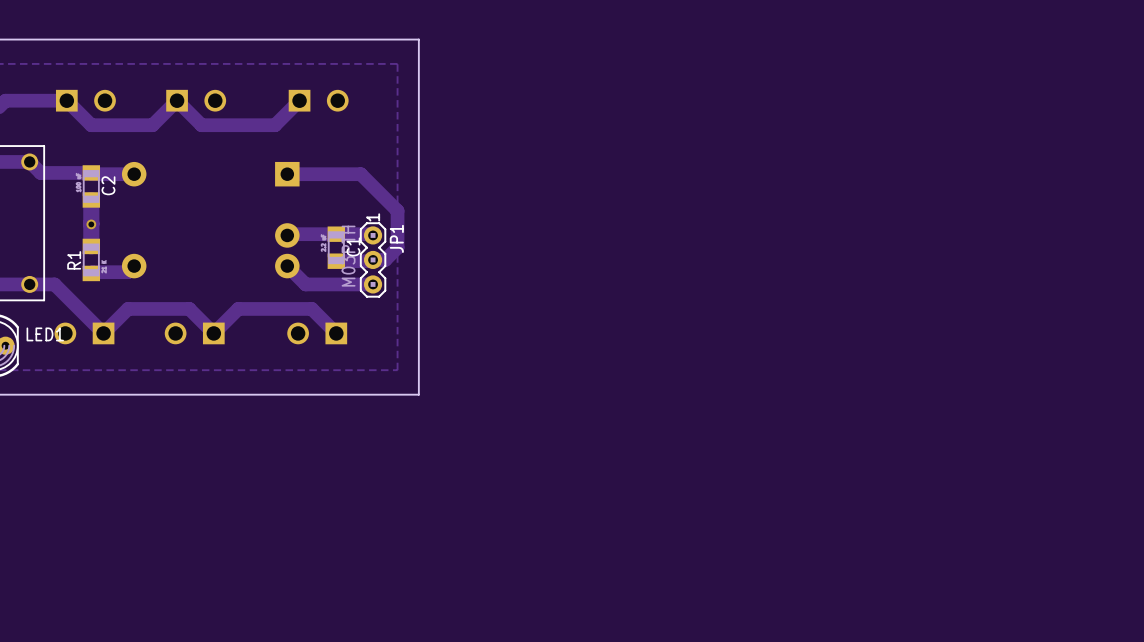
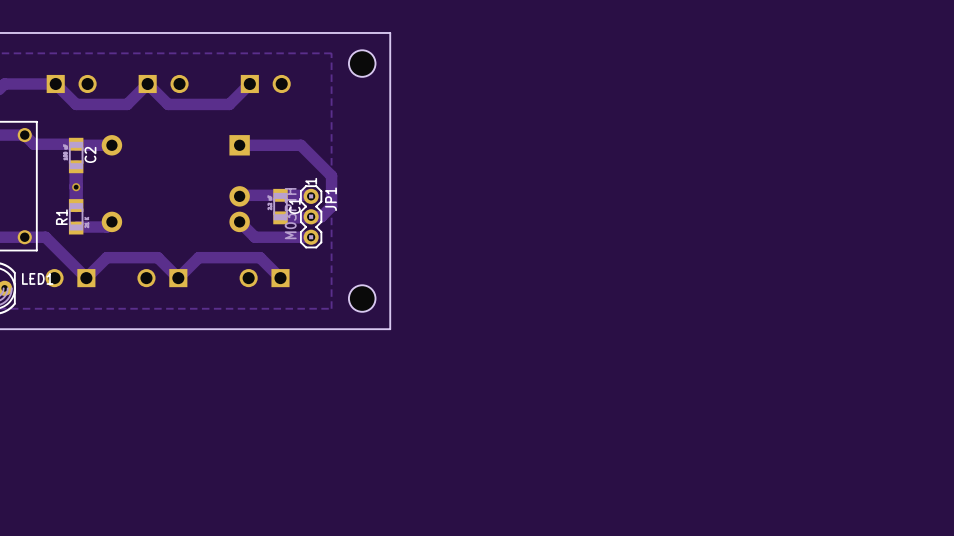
board edge: (418, 39) (418, 394) -> (349, 32) (390, 32) (390, 329) (349, 329)
part: none -> (362, 63)
part: none -> (362, 298)

